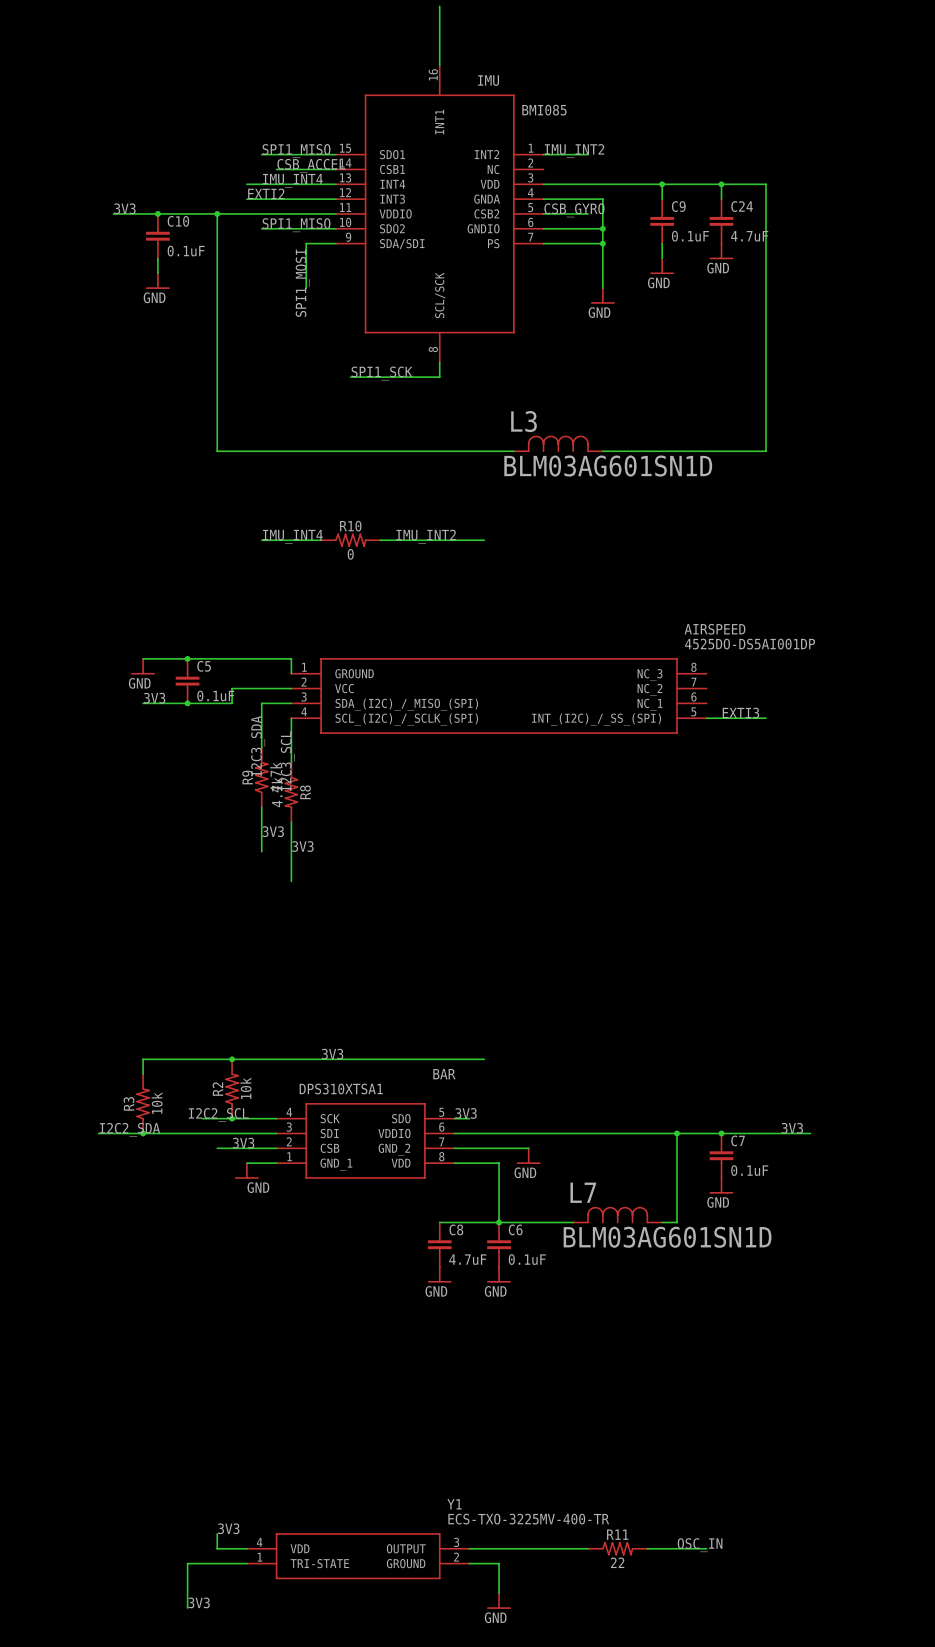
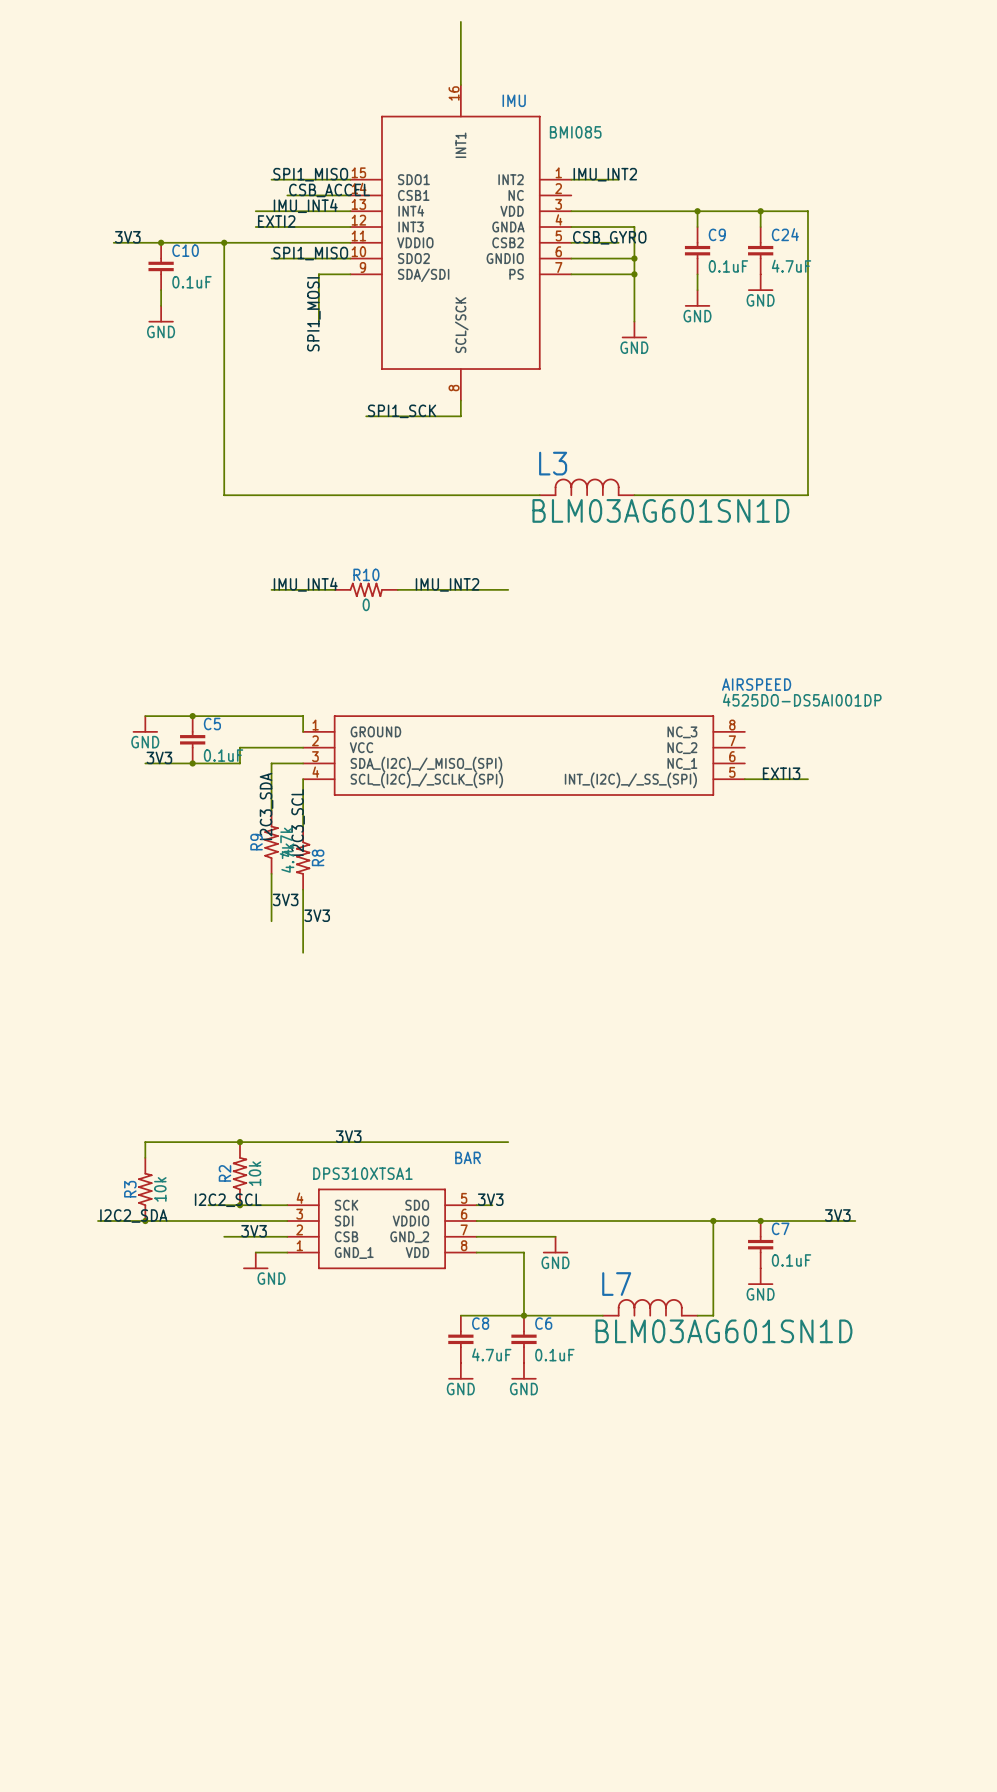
label: 3V3 (228, 1528) -> none
wire: (217, 1533) (217, 1548) (246, 1548) -> none
label: OSC_IN (700, 1545) -> none
wire: (469, 1548) (588, 1548) -> none
R11: 22 (617, 1548) -> none
wire: (647, 1548) (706, 1548) -> none
Y1: ECS-TXO-3225MV-400-TR (358, 1556) -> none
wire: (246, 1563) (187, 1563) (187, 1608) -> none
wire: (469, 1563) (499, 1563) (499, 1593) -> none
power symbol: GND (499, 1601) -> none
label: 3V3 (199, 1602) -> none

